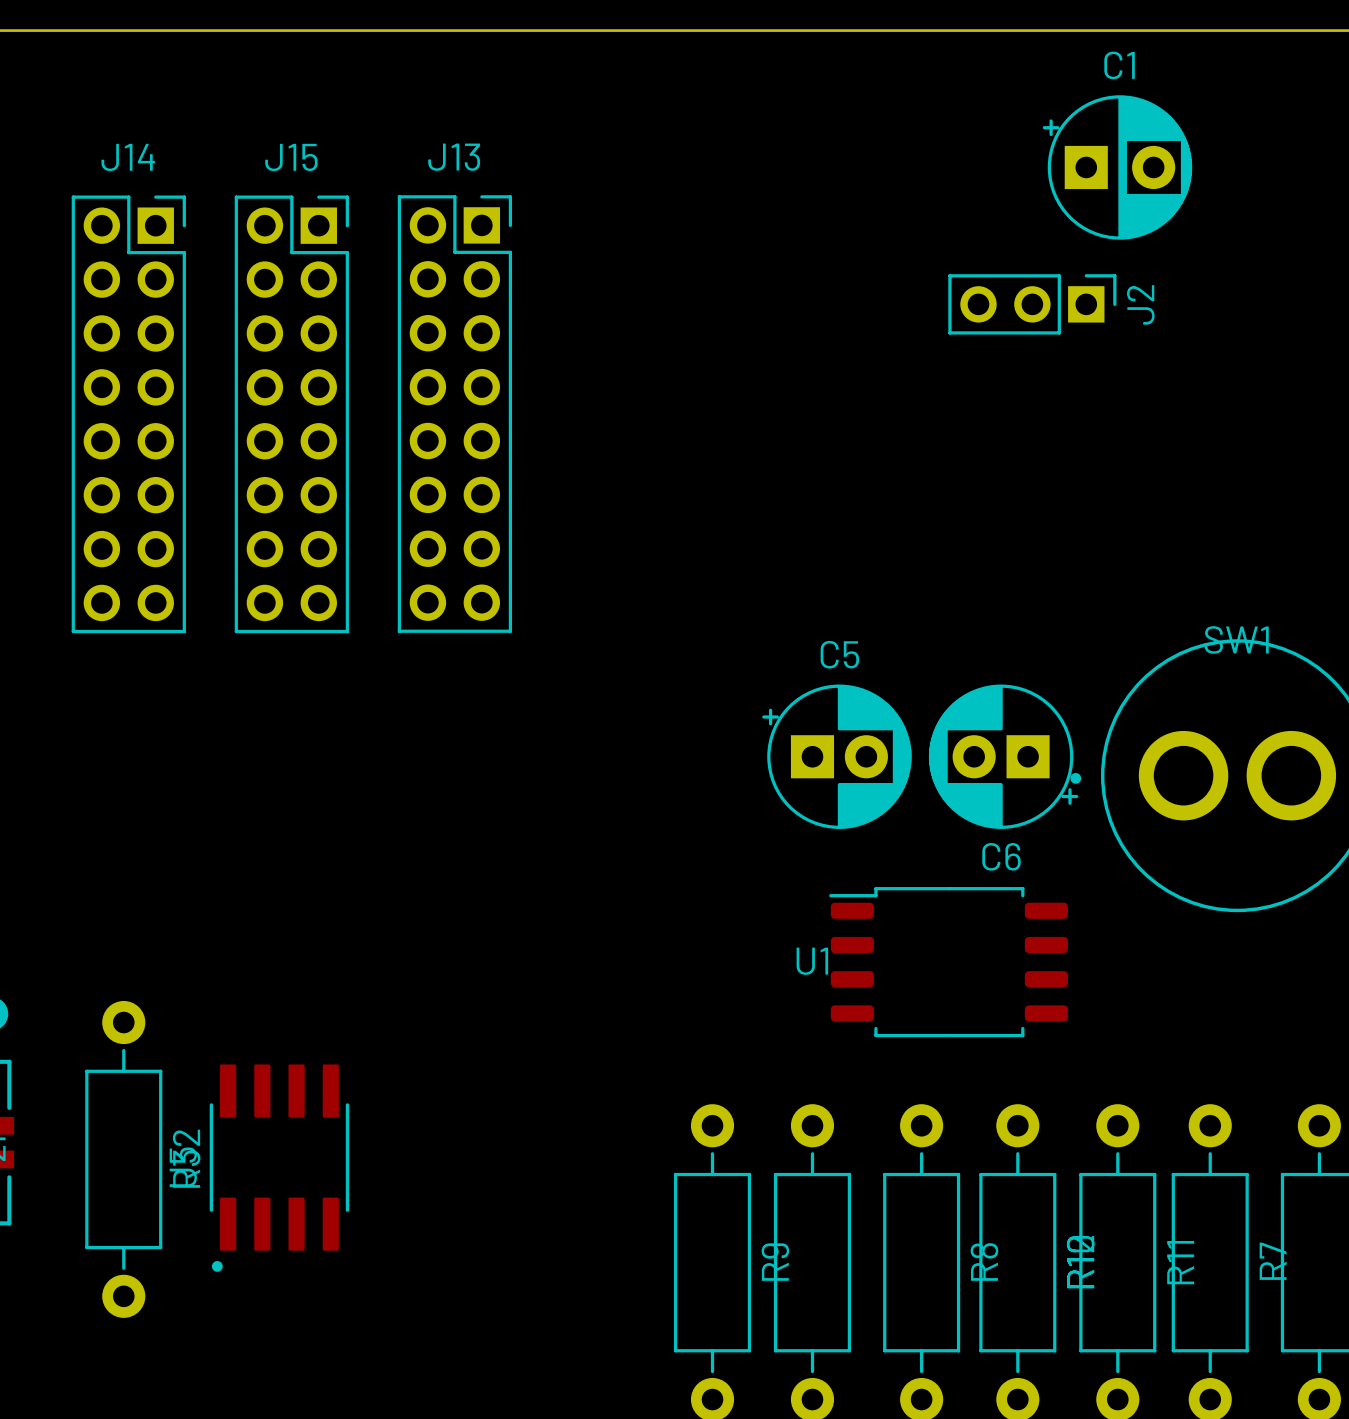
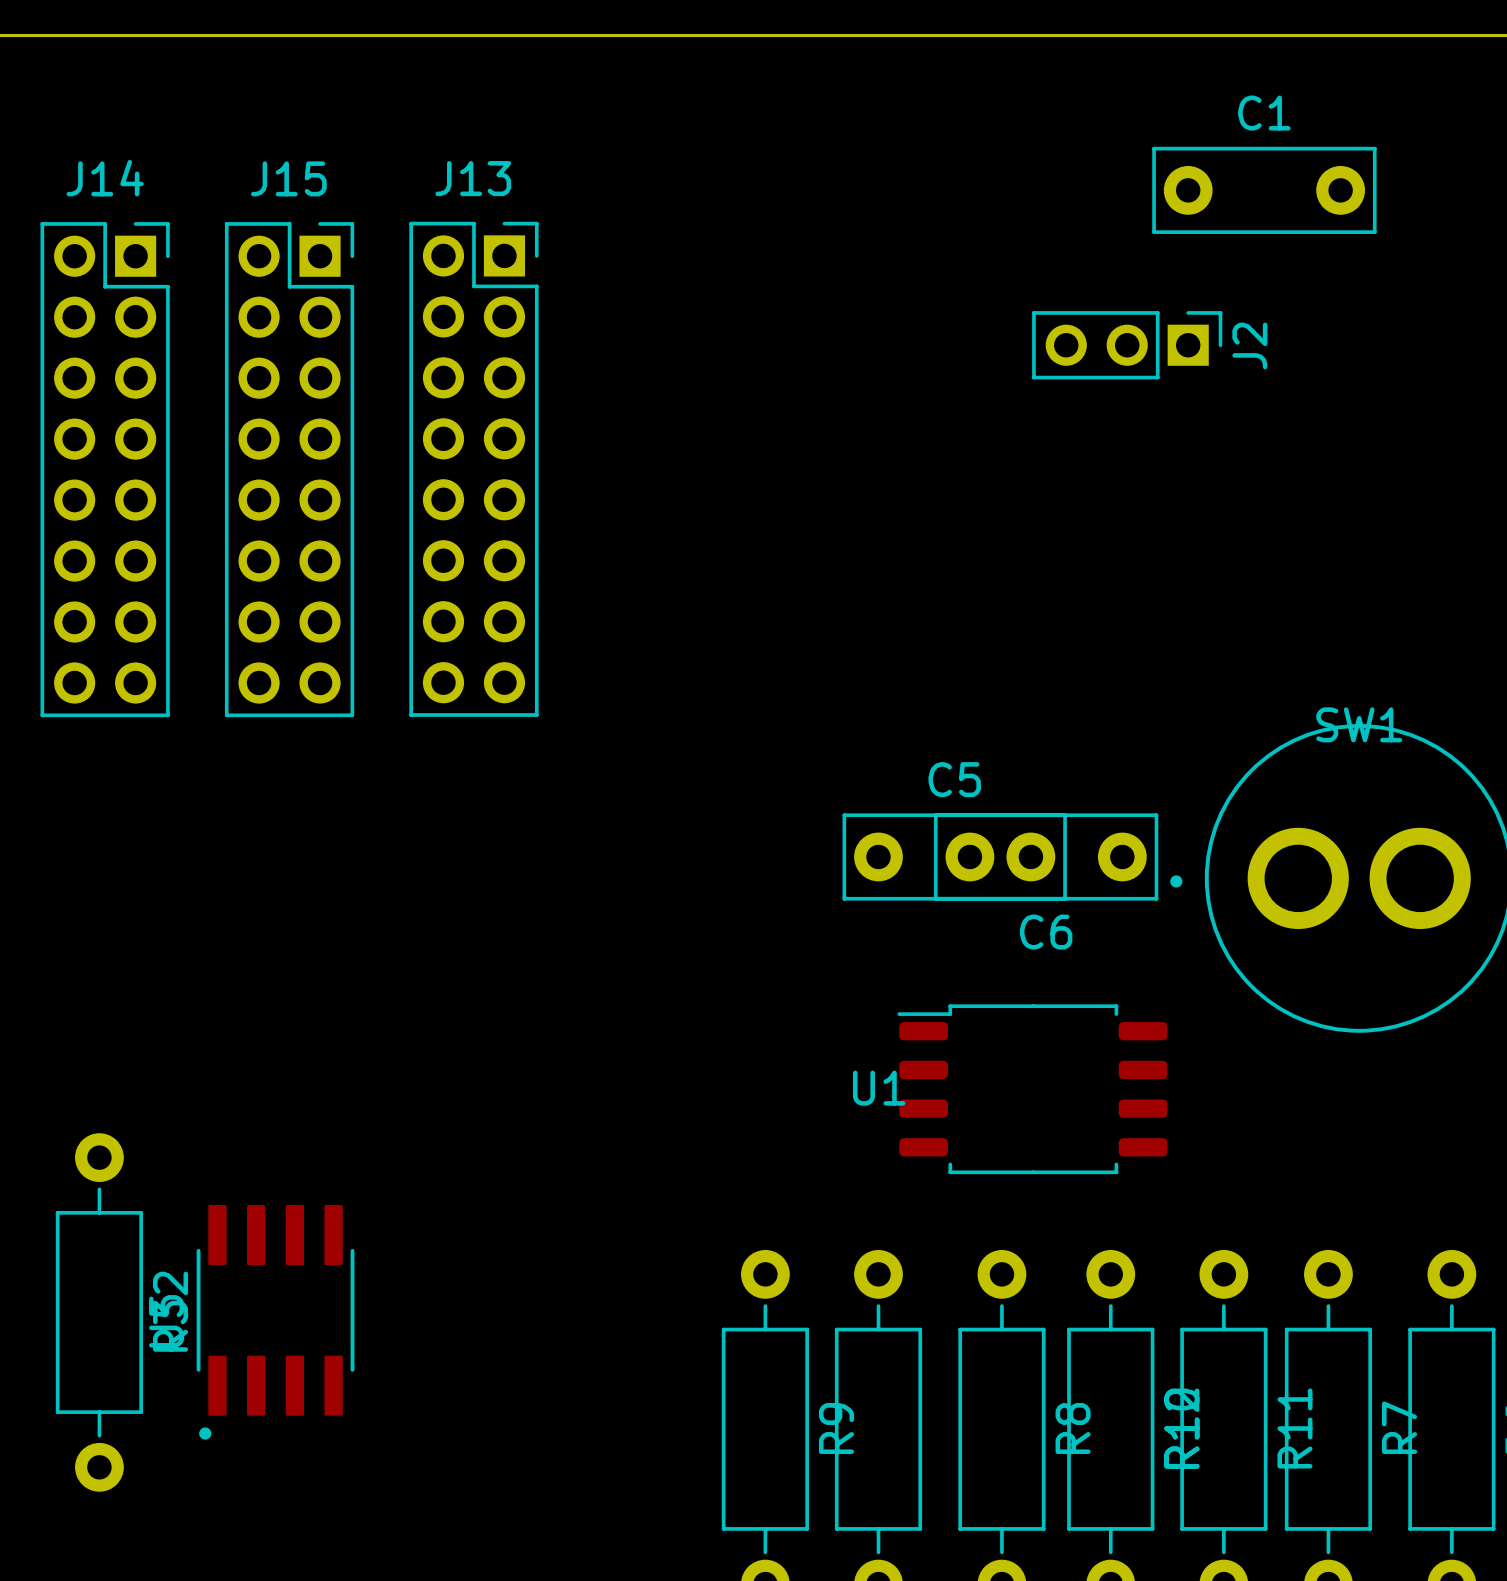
C1 footprint: [1042, 95, 1193, 240] -> [1152, 146, 1377, 234]
C5 footprint: [762, 684, 912, 829] -> [842, 813, 1067, 901]
C6 footprint: [928, 684, 1079, 829] -> [933, 813, 1159, 901]

